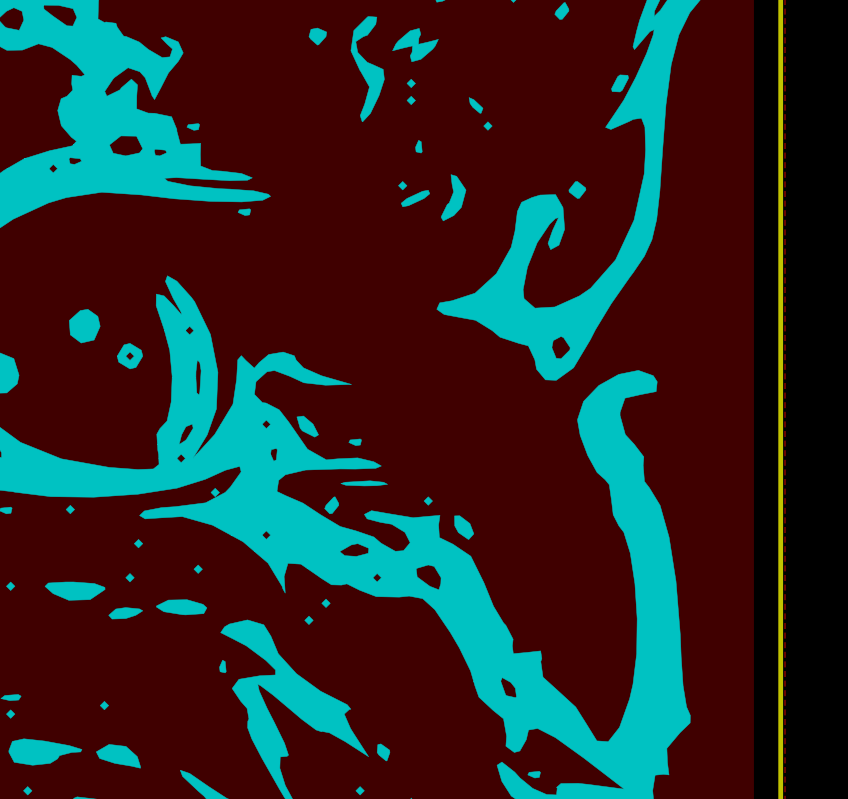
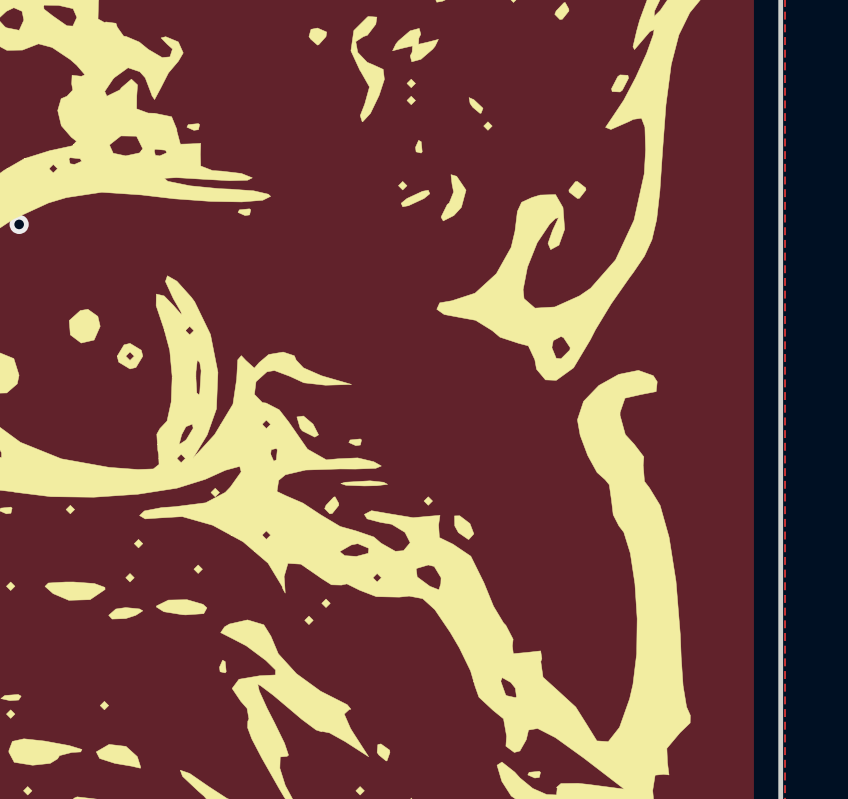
via: none -> (19, 224)

